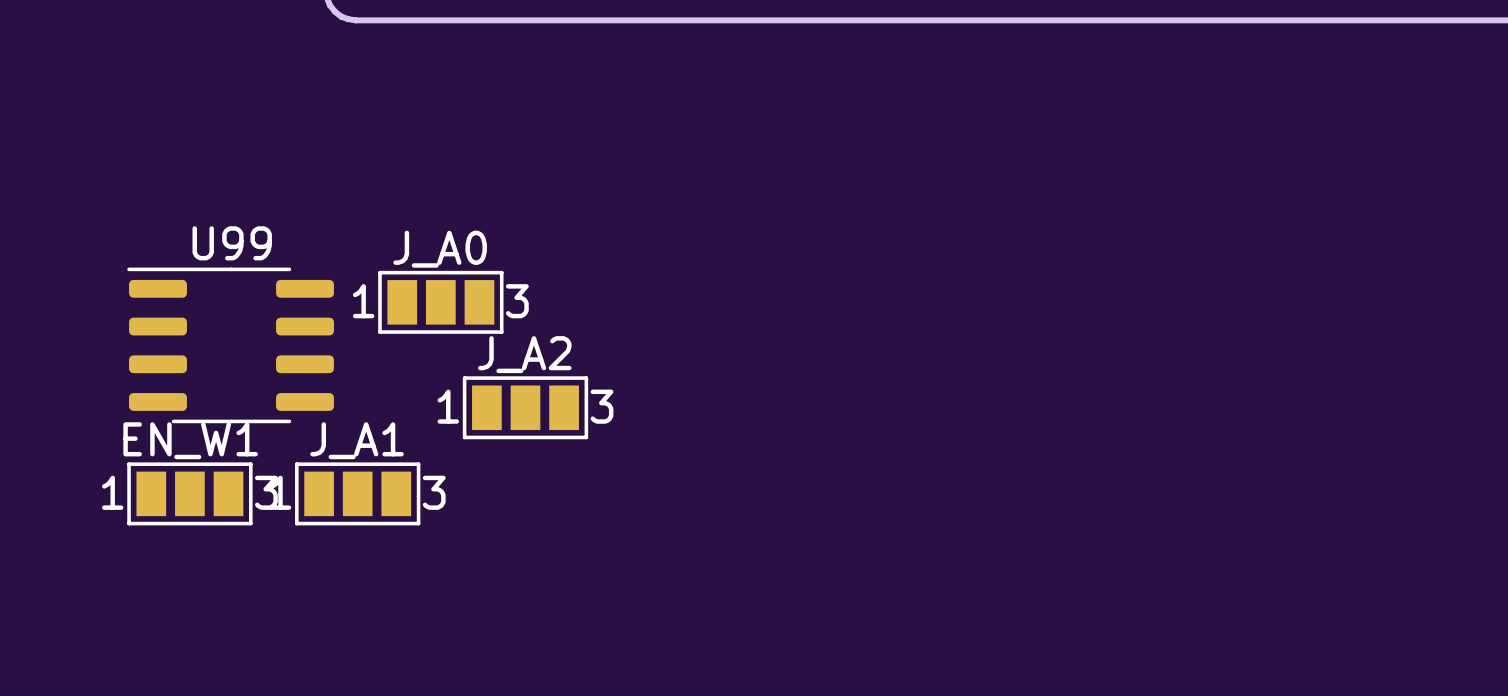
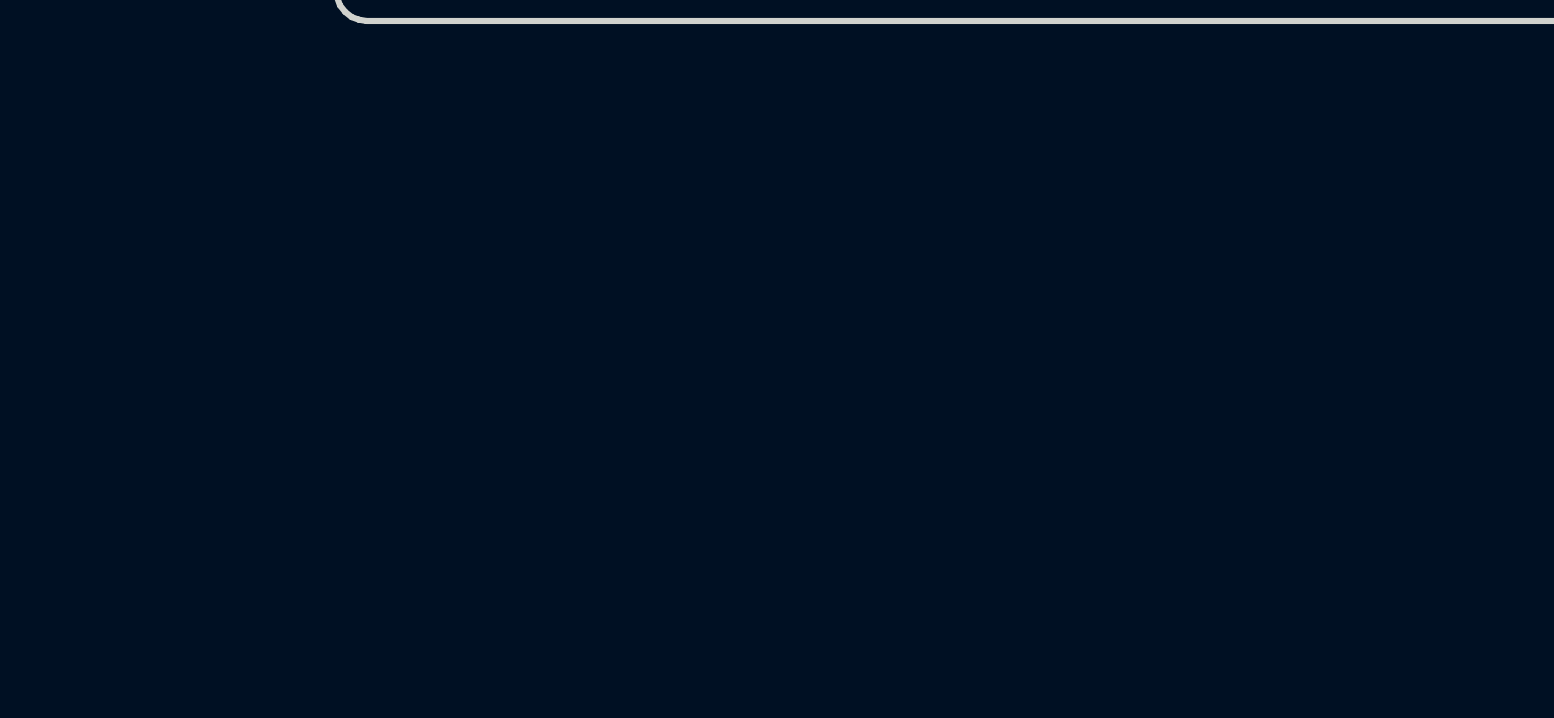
J_A0: (440, 302) -> none
U99: (230, 345) -> none
J_A2: (525, 407) -> none
EN_W1: (189, 493) -> none
J_A1: (357, 493) -> none

